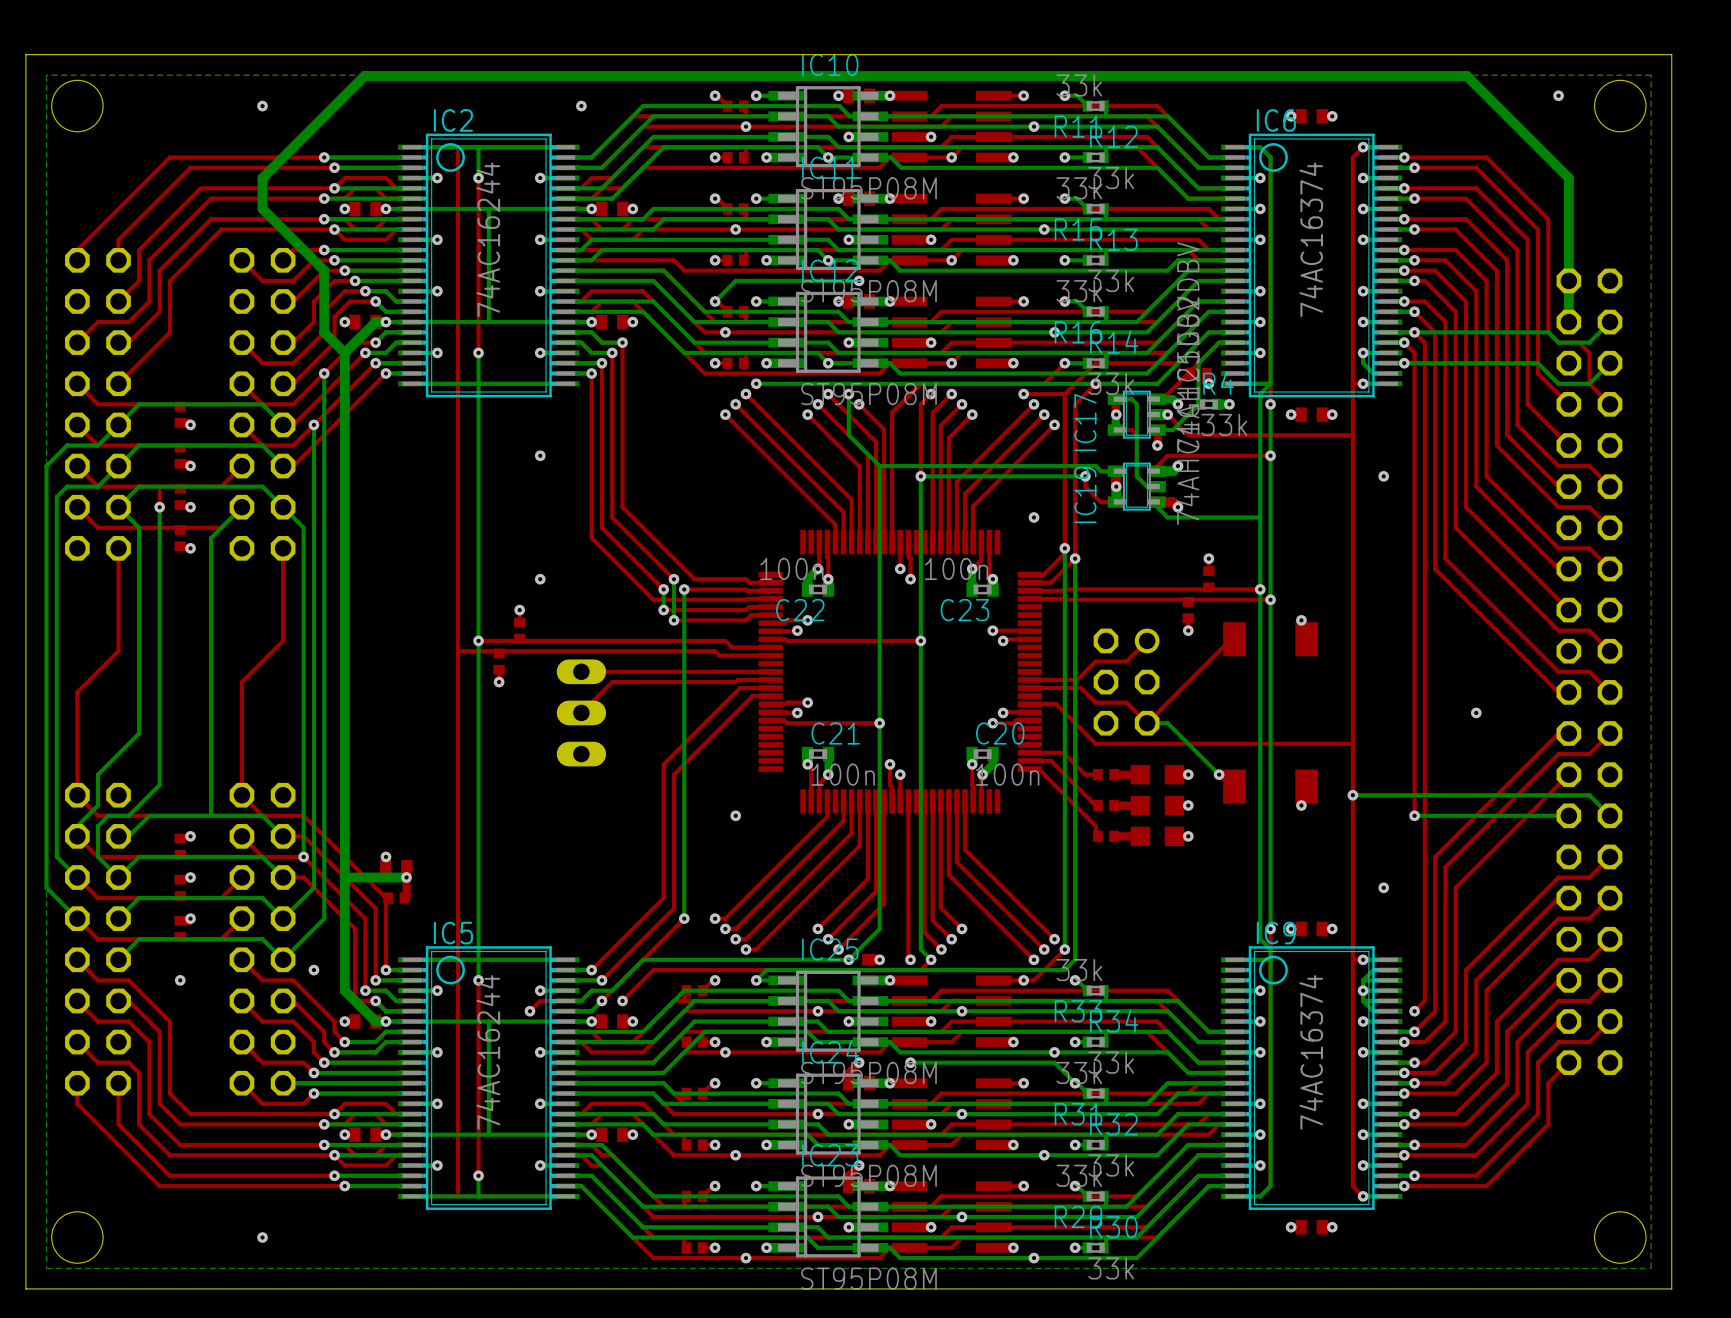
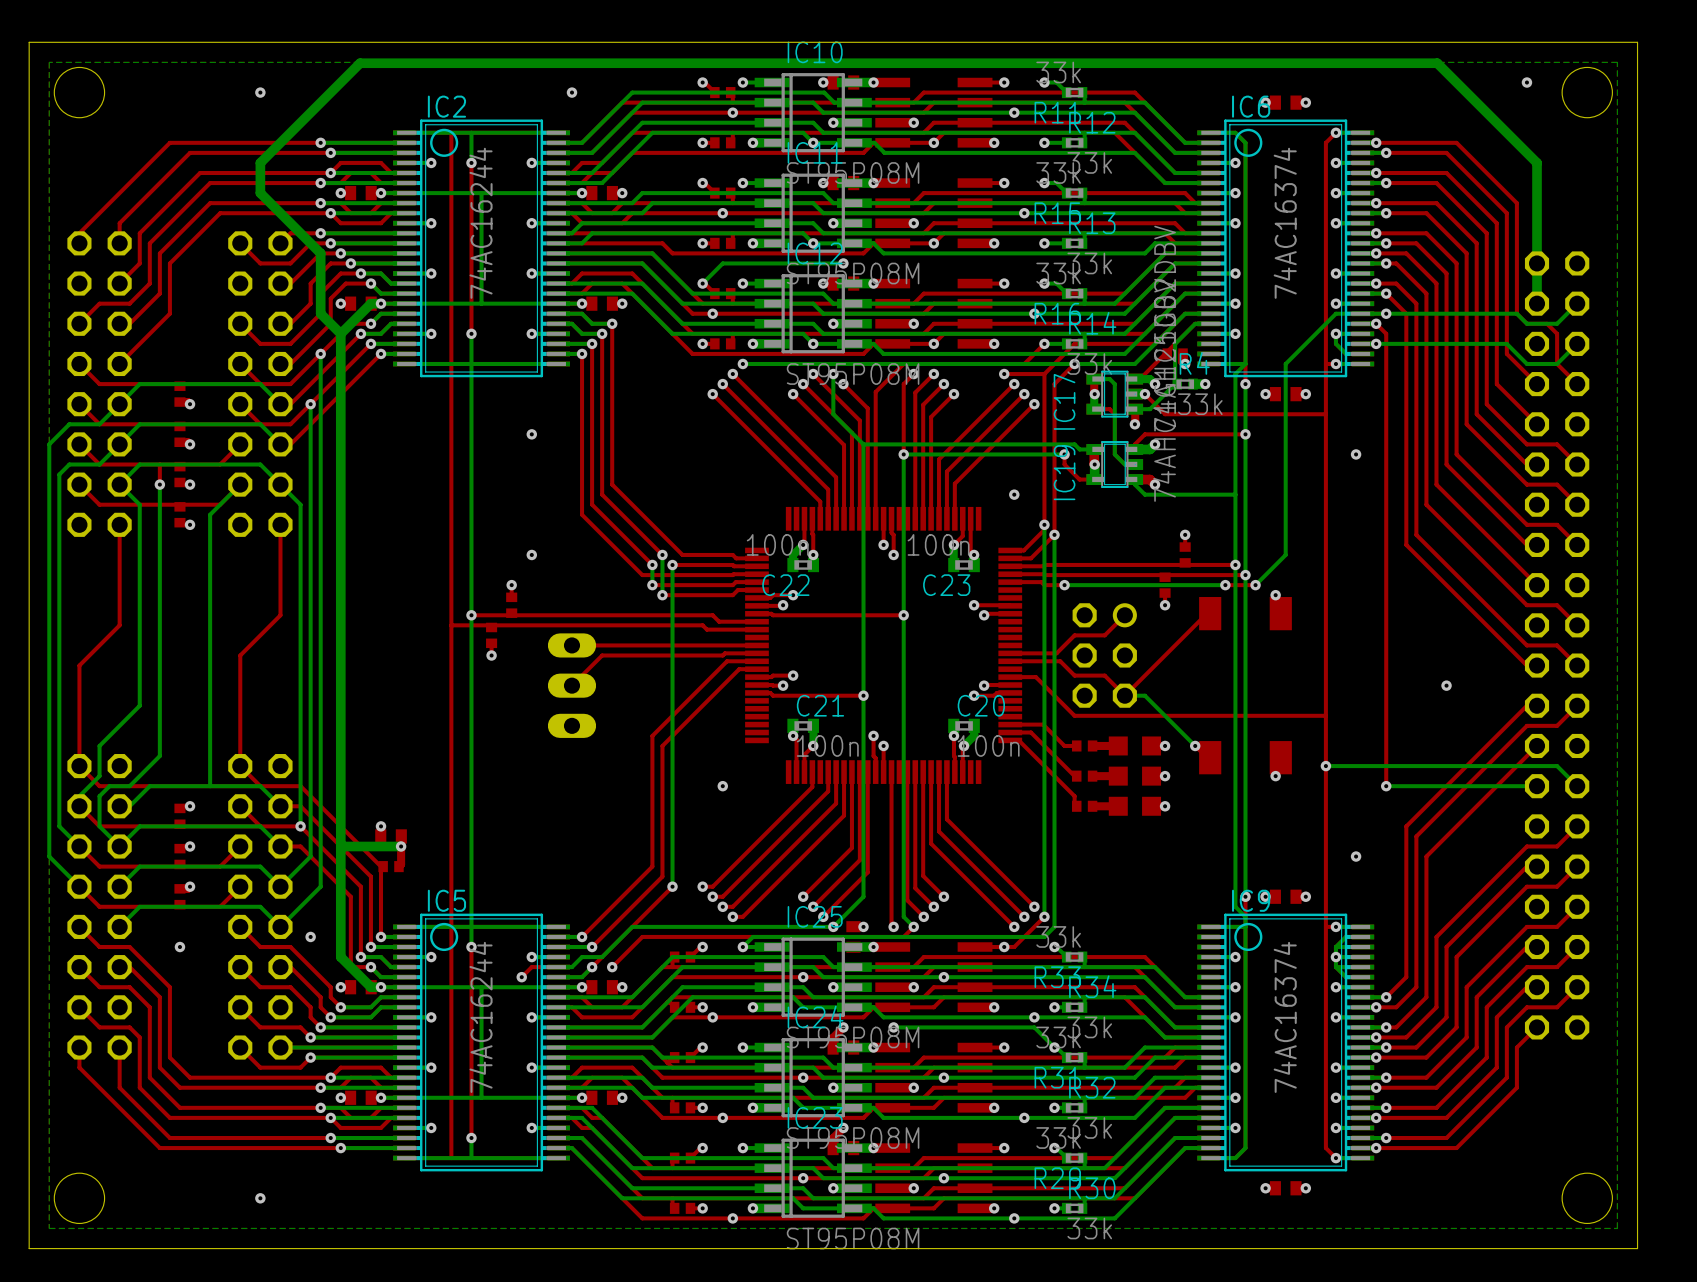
bottom track: none -> (1362, 313) (1335, 313) (1285, 363) (1285, 554) (1255, 585)
top track: (1414, 332) (1424, 342) (1424, 1000) (1414, 1011) -> none
top track: none -> (1010, 582) (1041, 582) (1044, 585) (1064, 585)
via: none -> (1064, 585)
bottom track: none -> (1225, 585) (1064, 585)
via: none -> (1225, 585)
top track: none -> (1255, 585) (1225, 585)
via: none -> (1255, 585)
via: (1414, 1011) -> none

